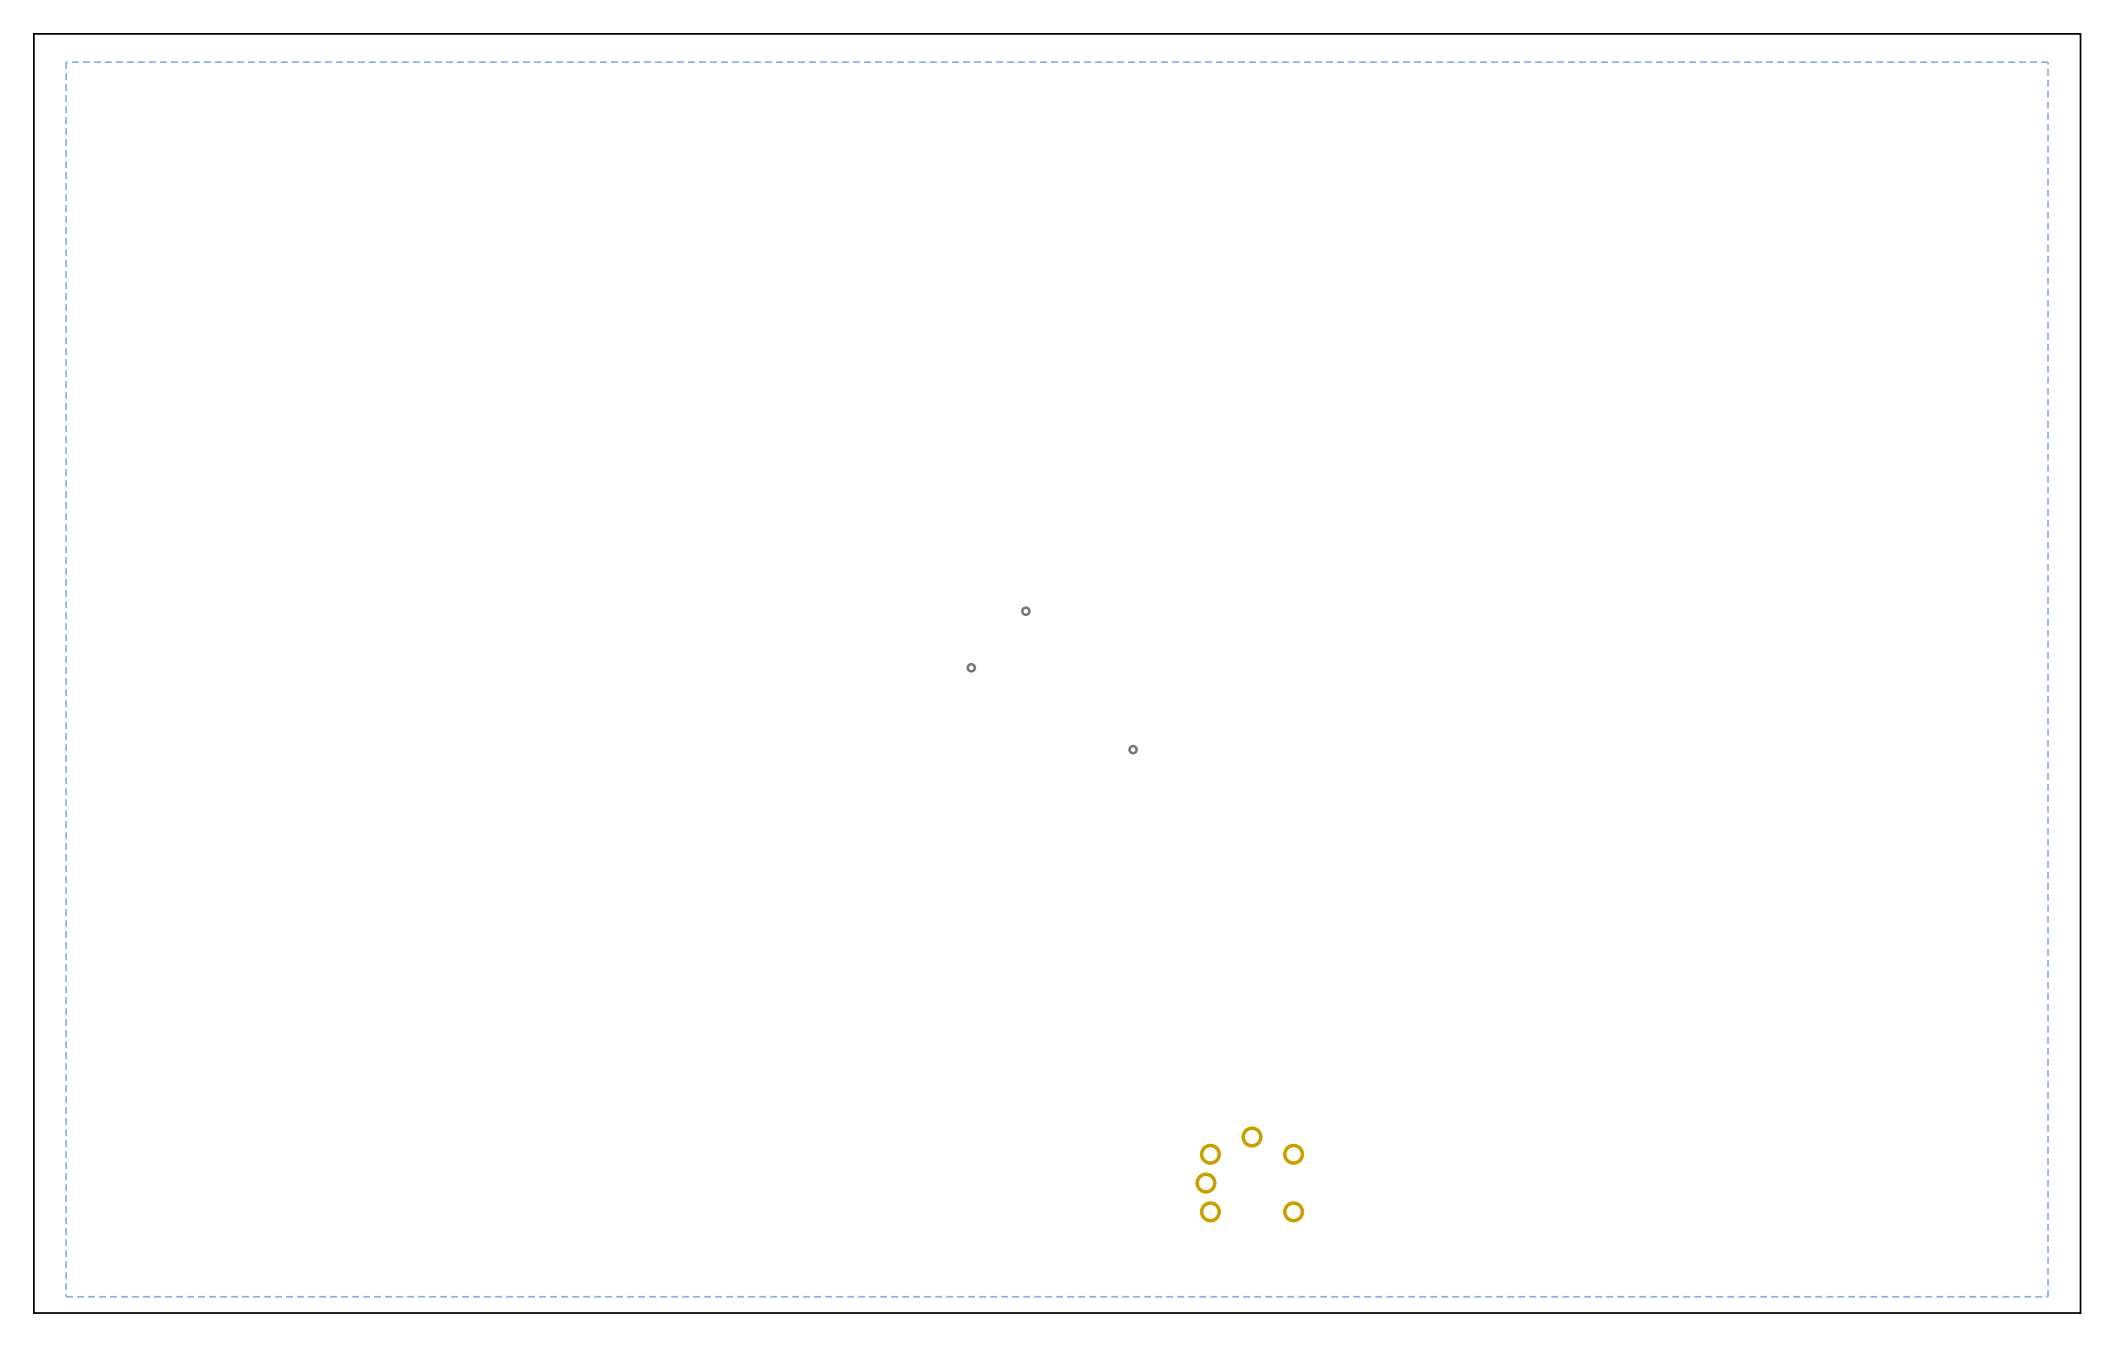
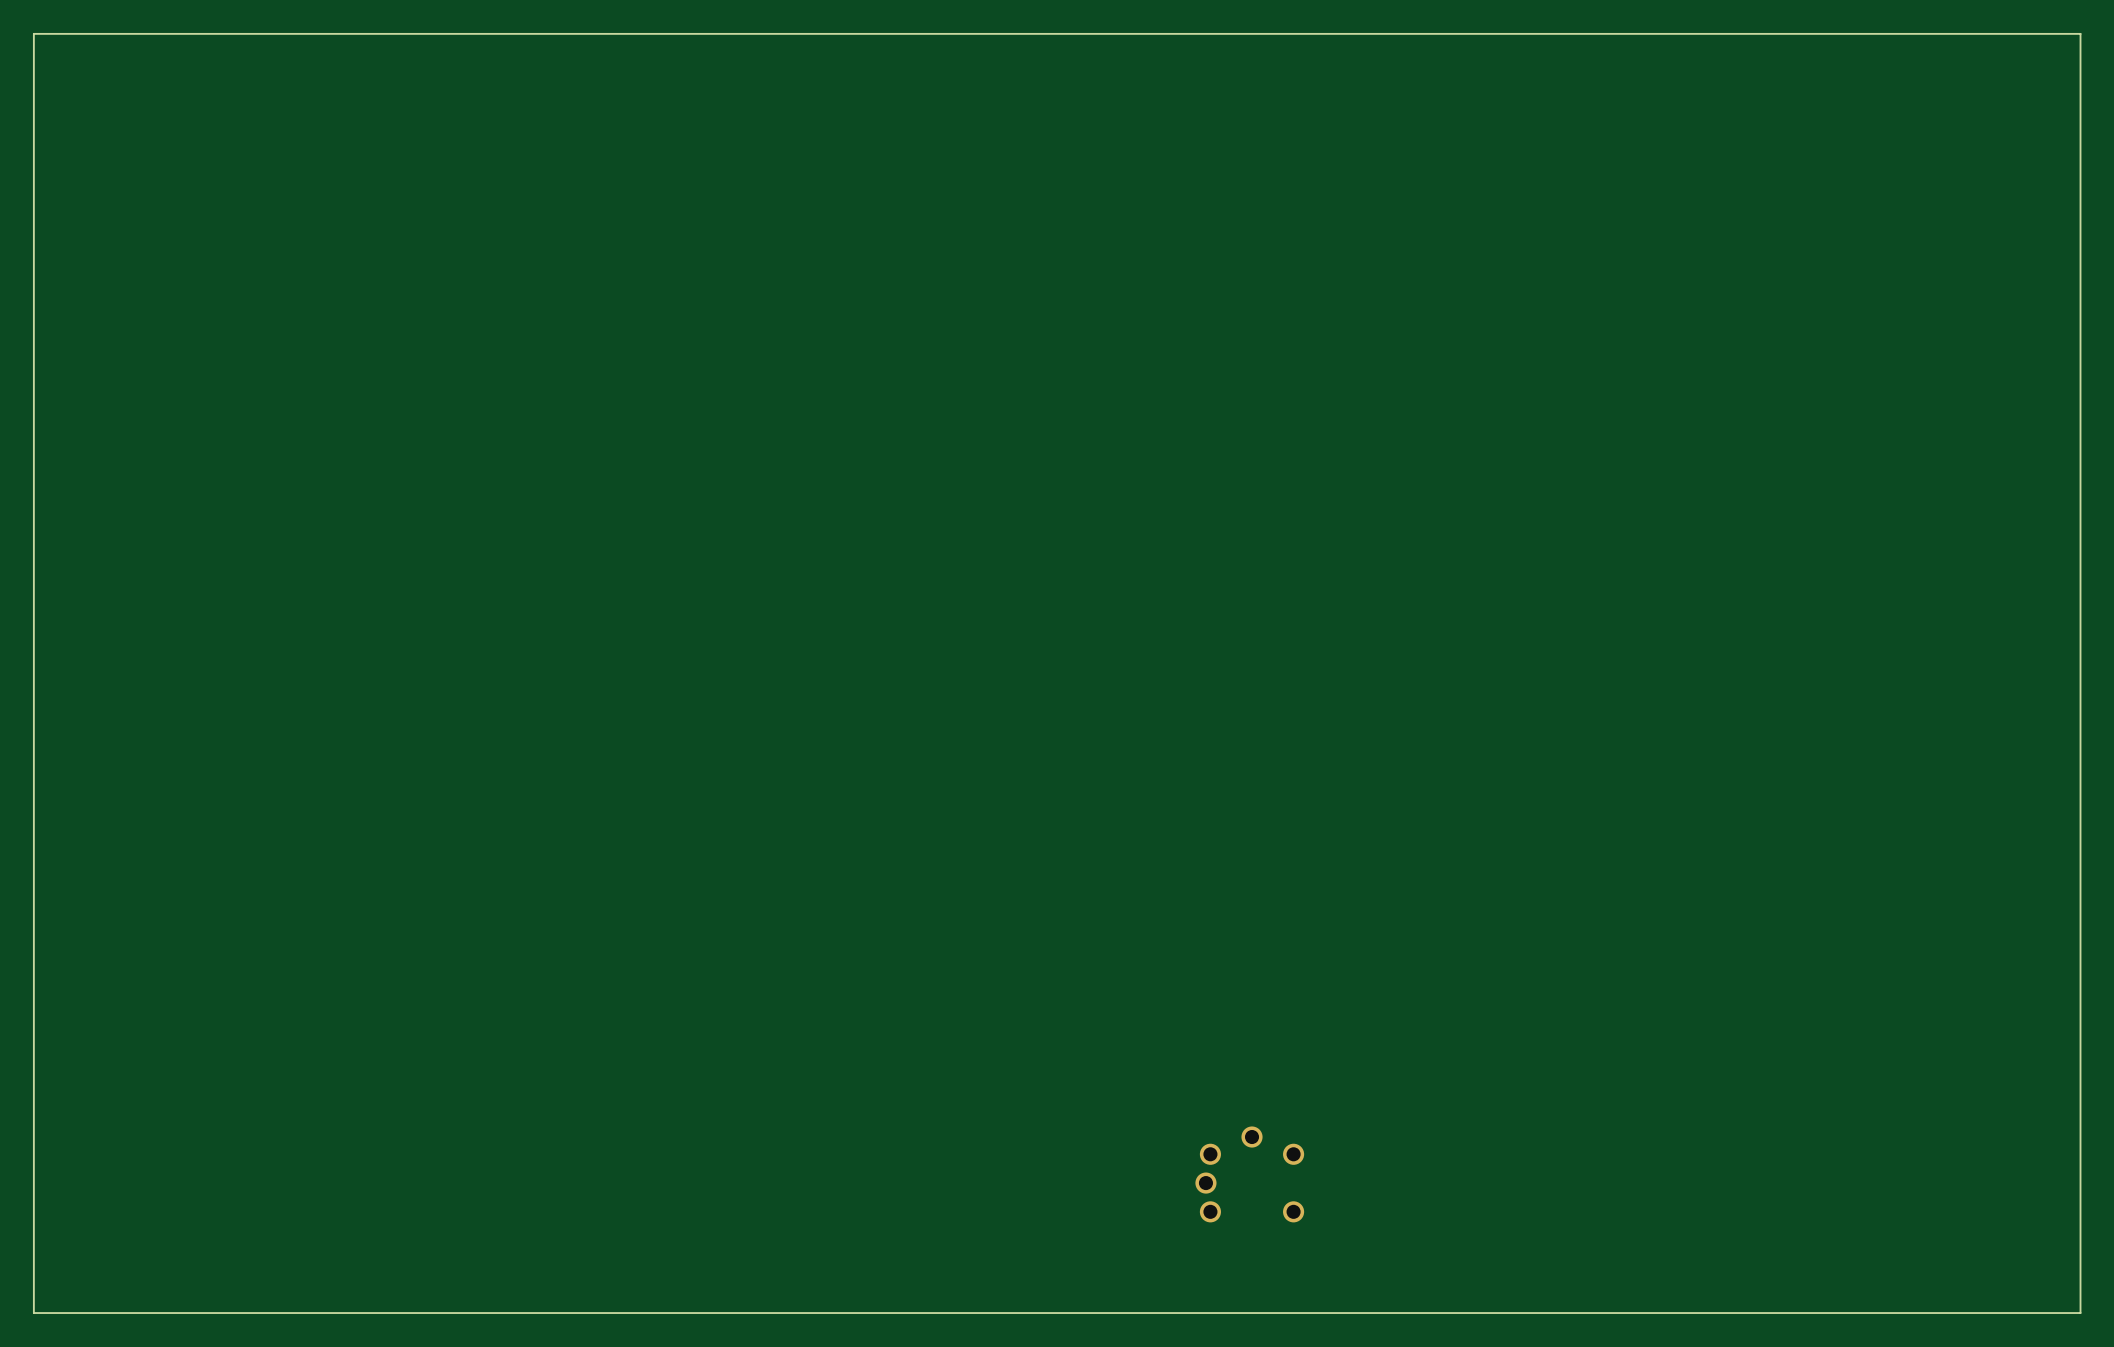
zone outline: (2048, 62) (66, 62) (66, 1296) (2048, 1296) (2048, 62) -> none
via: (1025, 611) -> none
via: (971, 667) -> none
via: (1133, 749) -> none

